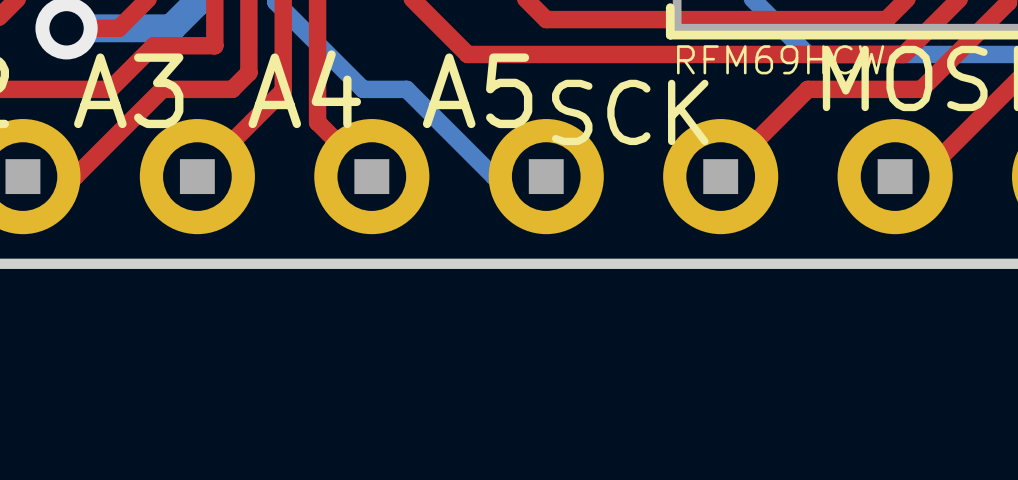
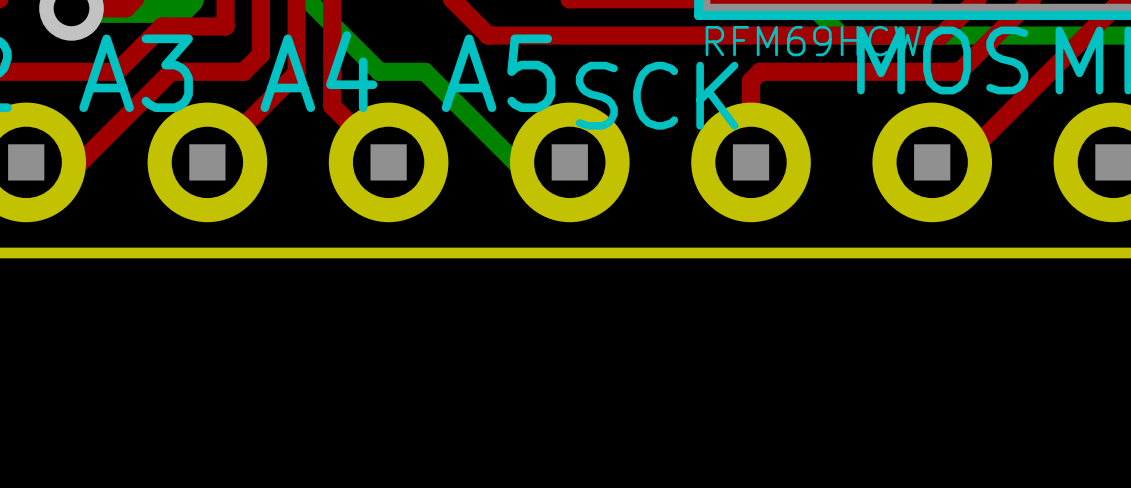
top track: (807, 89) (720, 176) -> (841, 71) (760, 71) (751, 80) (751, 162)

